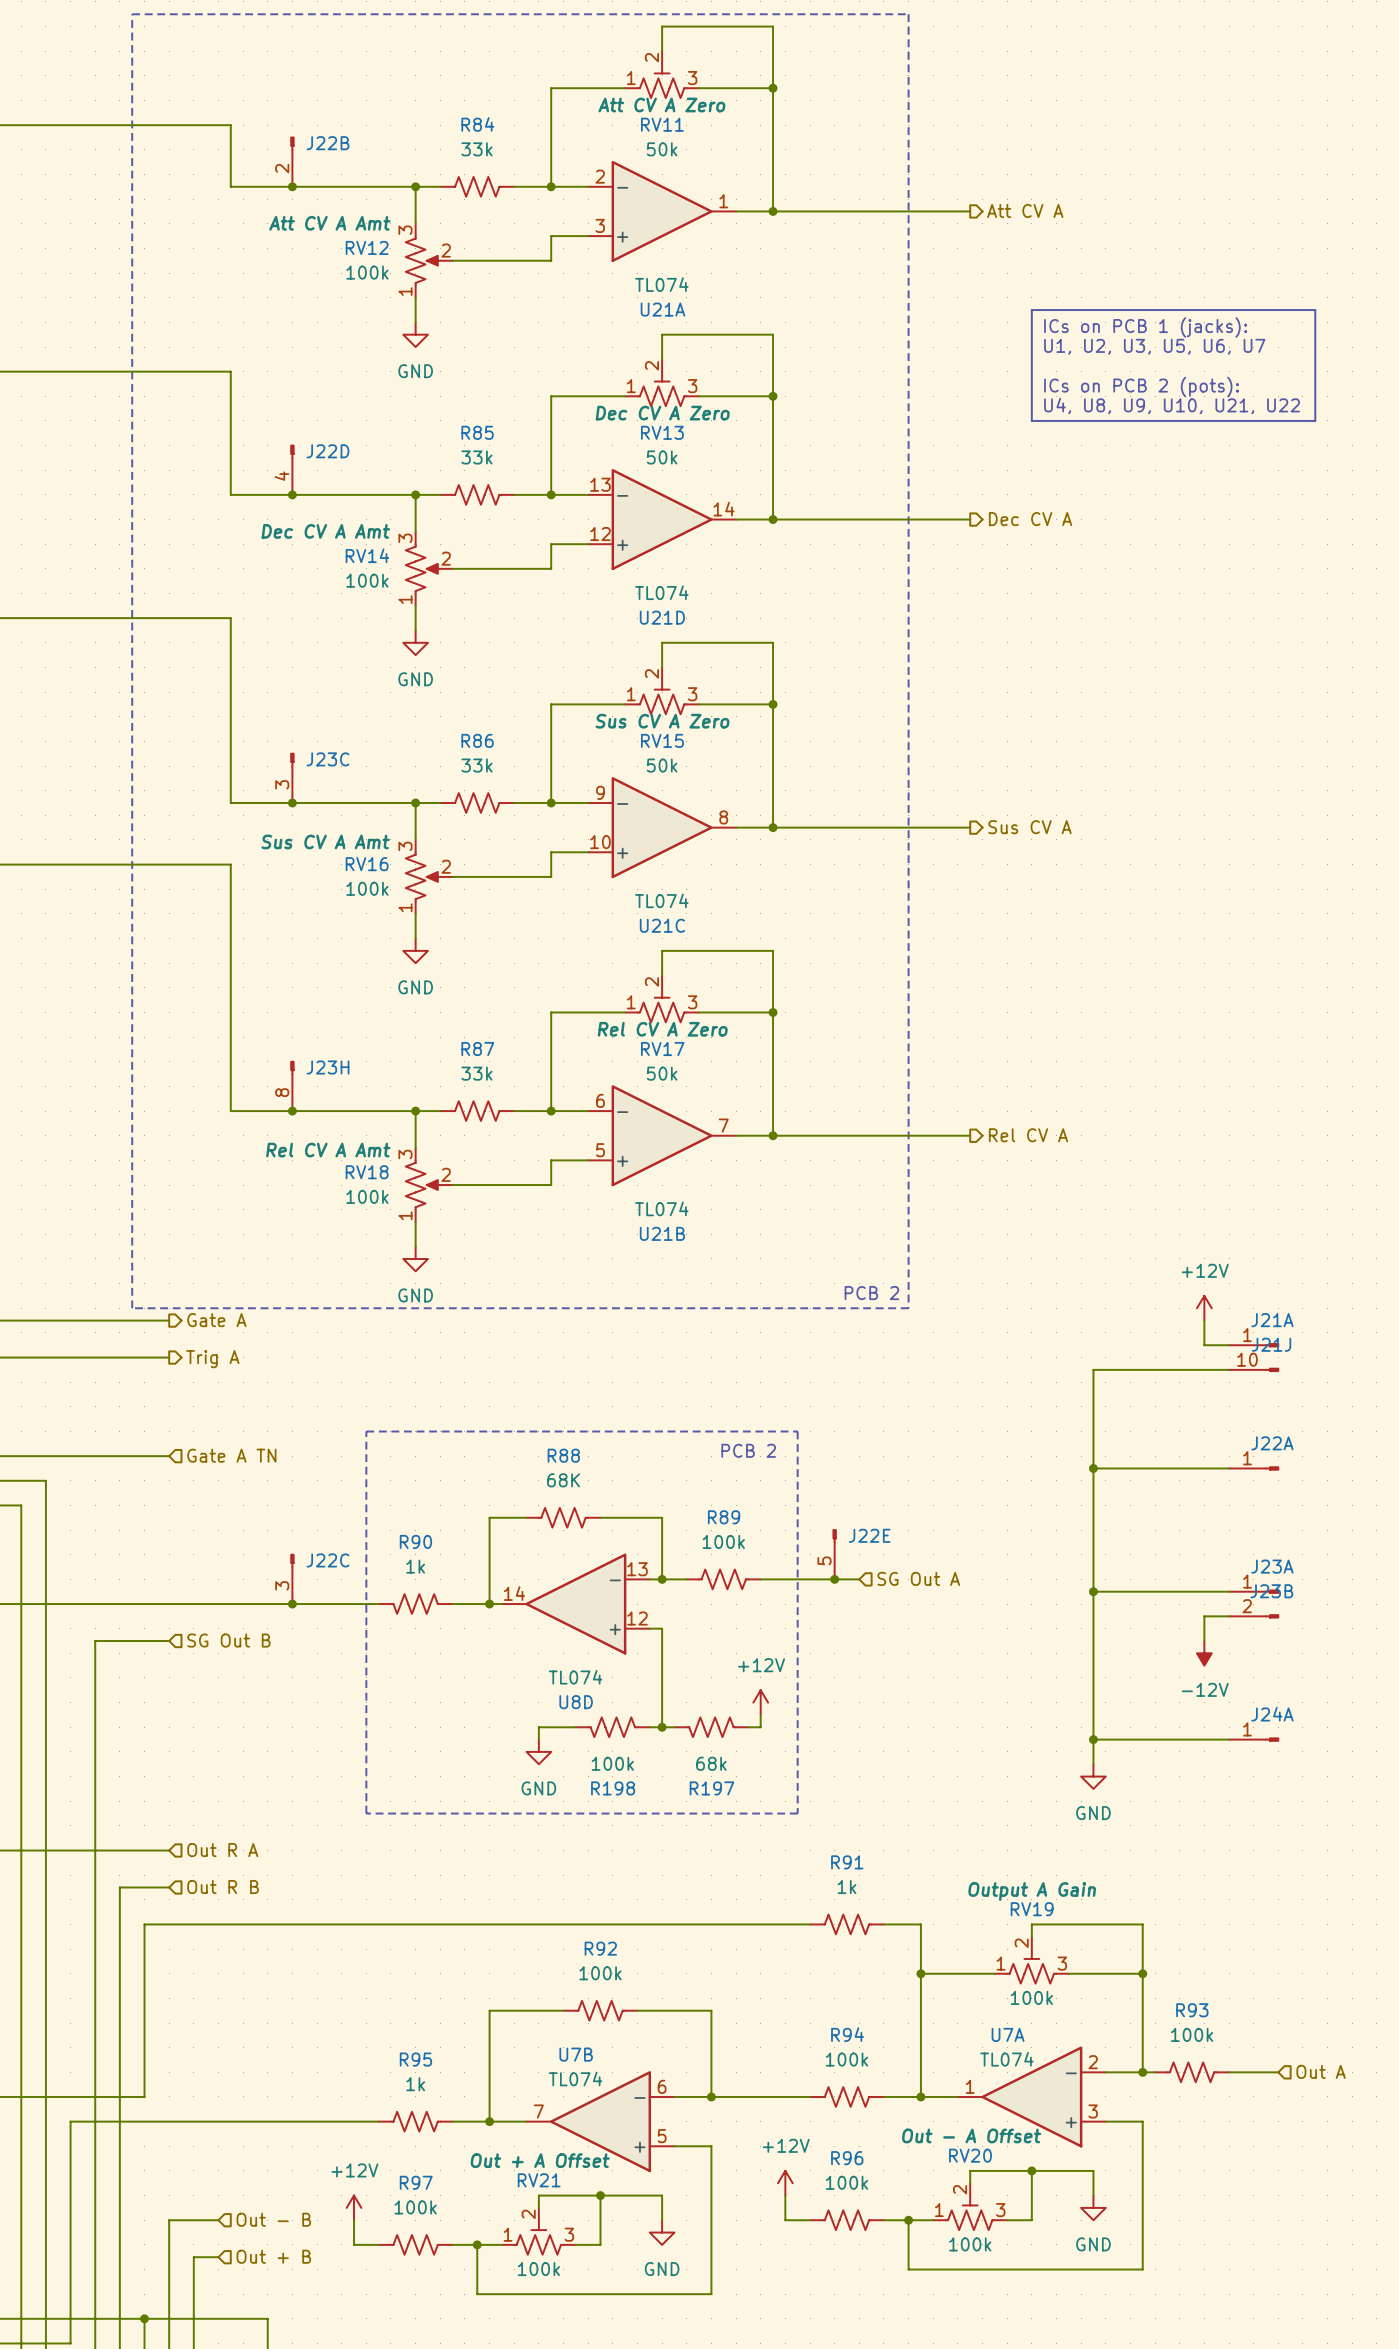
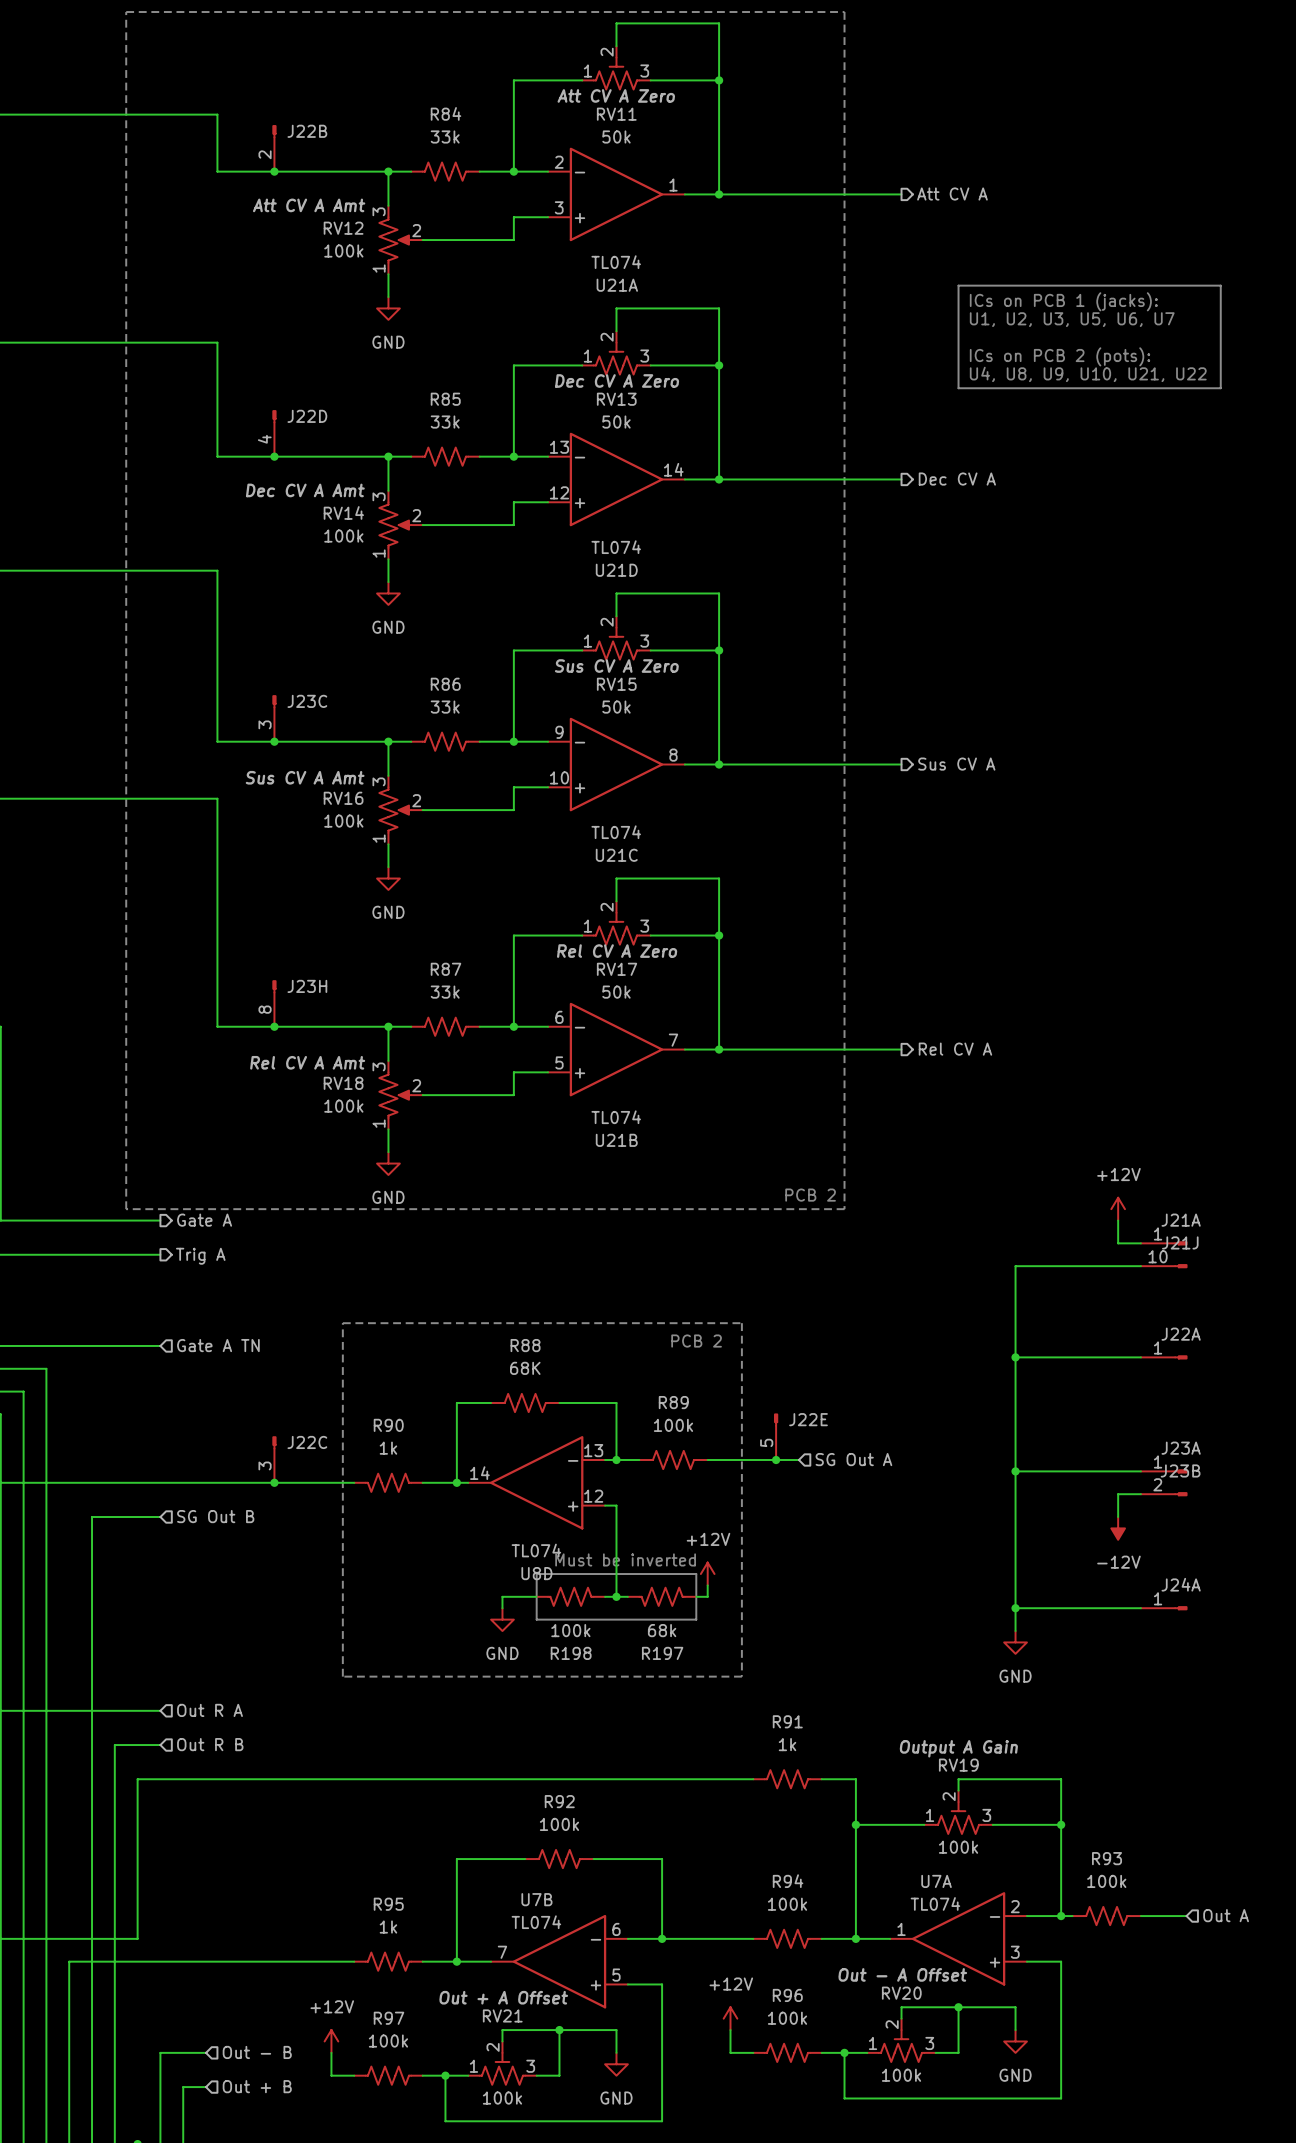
text: none -> Must be inverted (625, 1559)
line: none -> (536, 1574) (696, 1574) (696, 1619) (536, 1619) (536, 1574)

